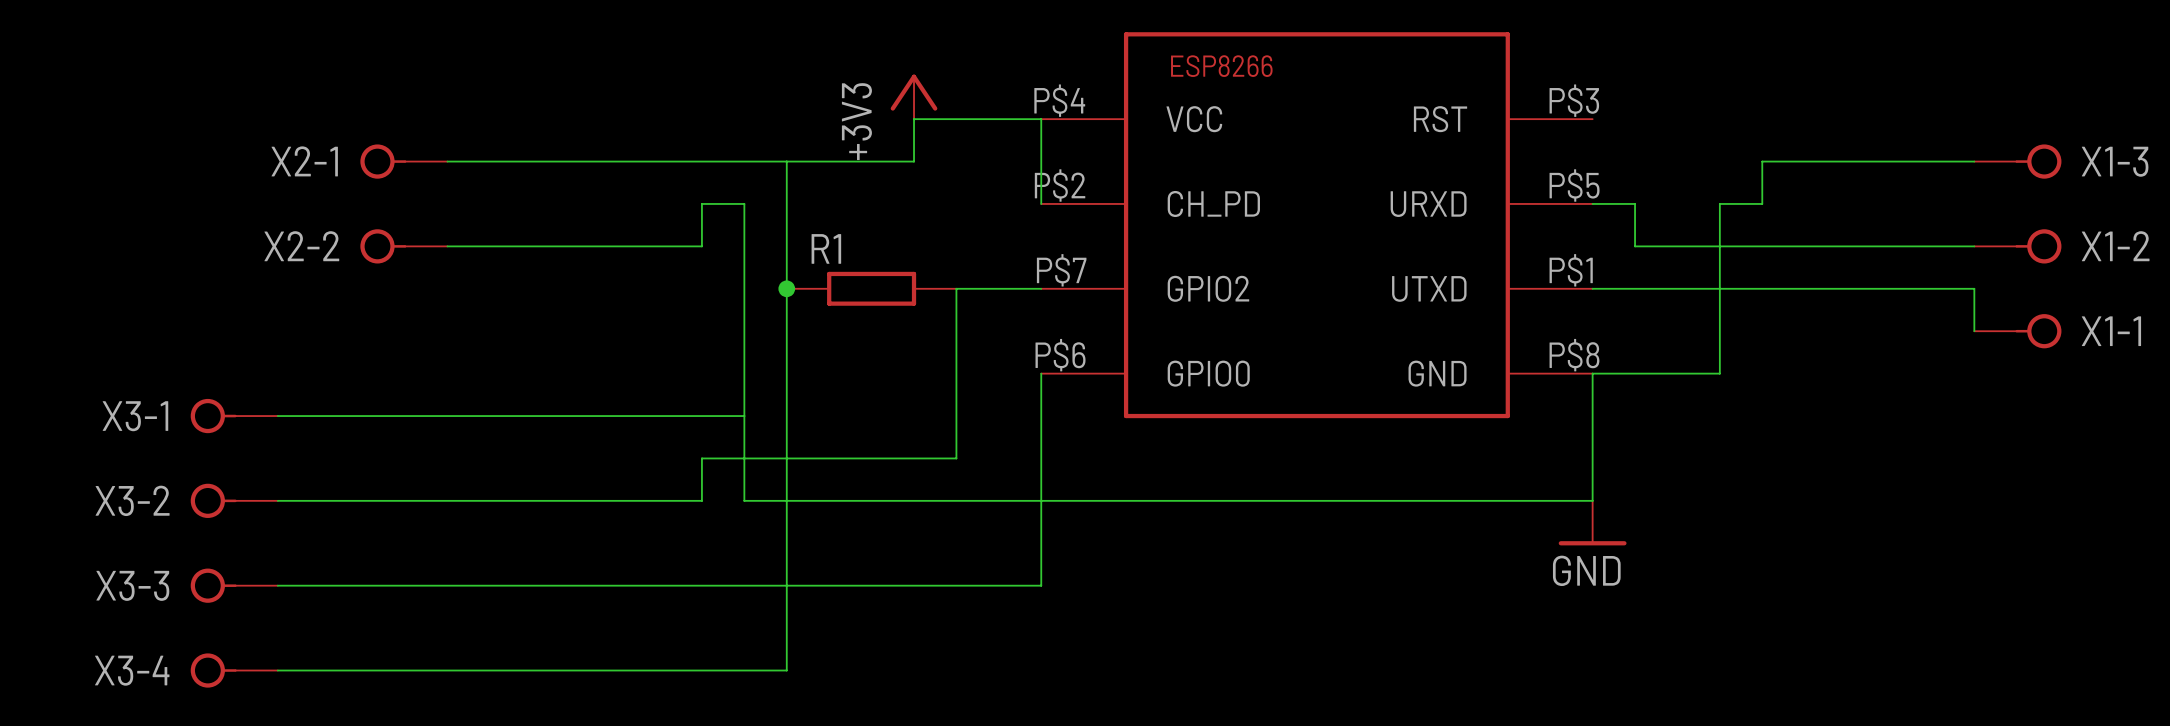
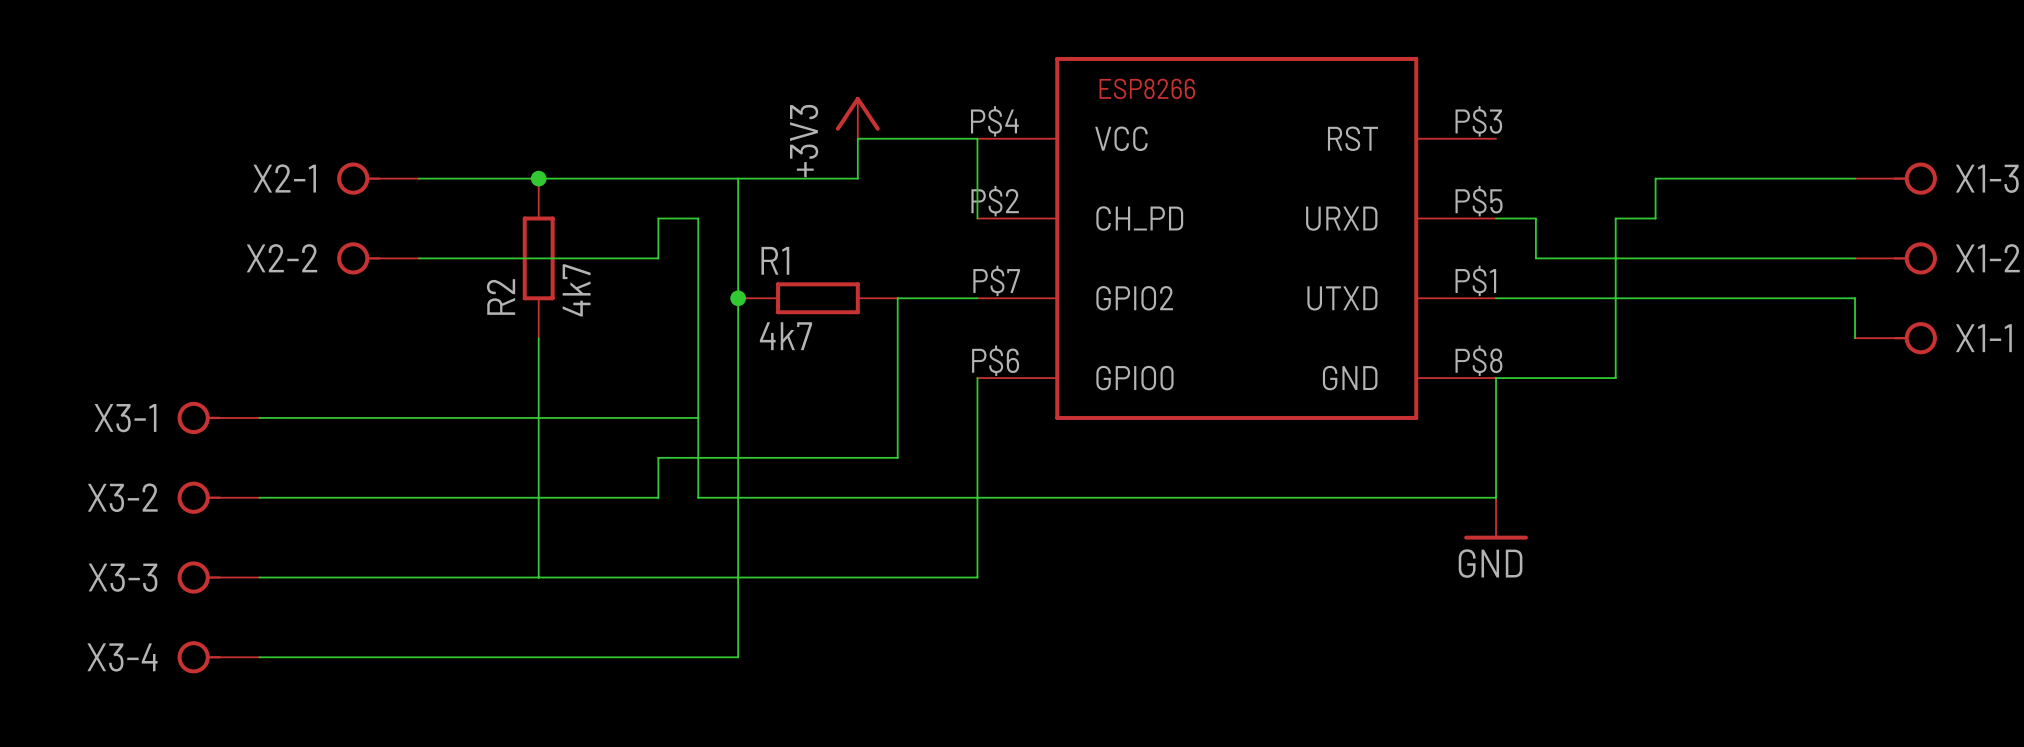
junction: none -> (538, 178)
R2: none -> 4k7 (538, 258)
R1 value: none -> 4k7 (785, 336)
wire: none -> (538, 338) (538, 577)

